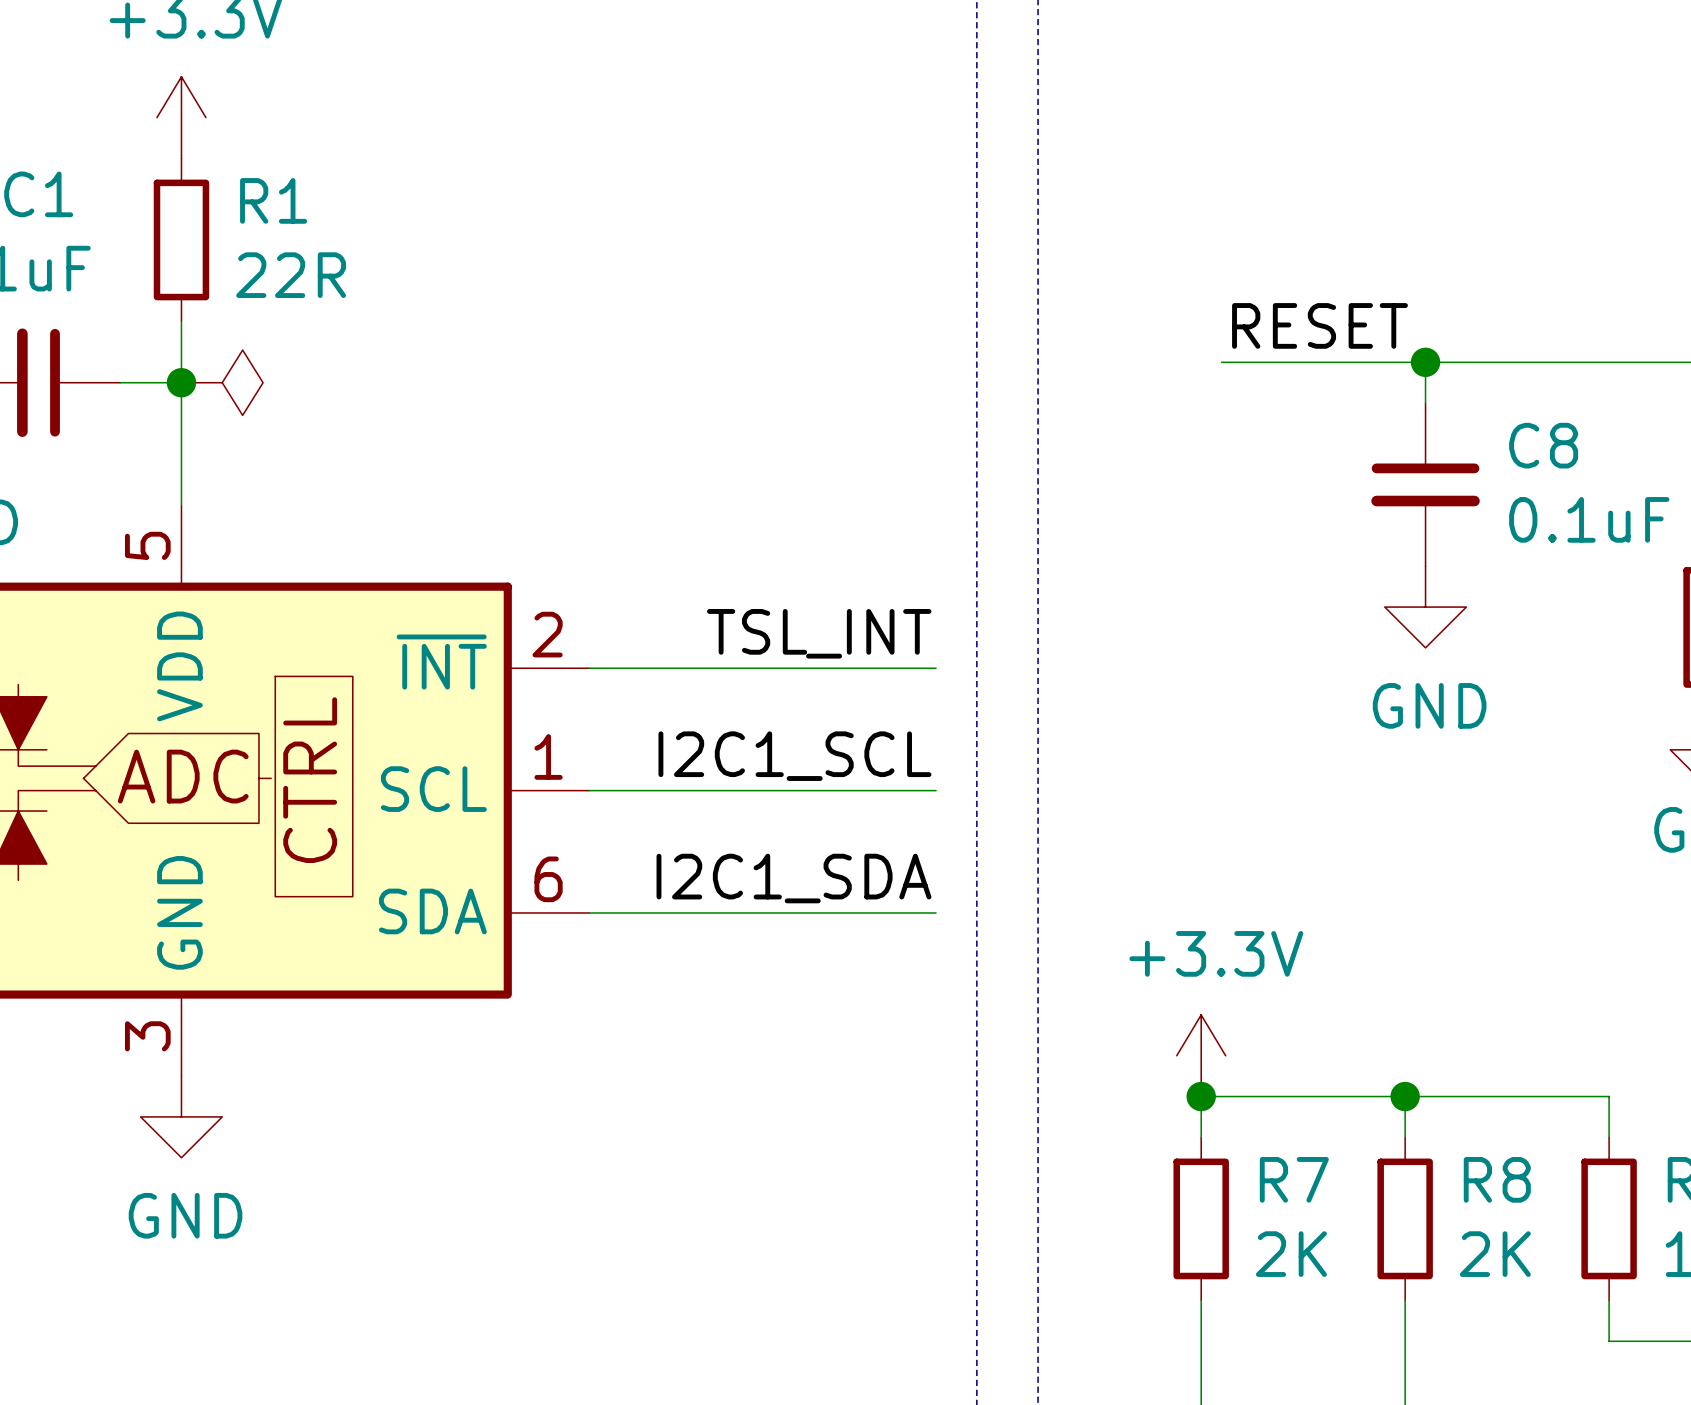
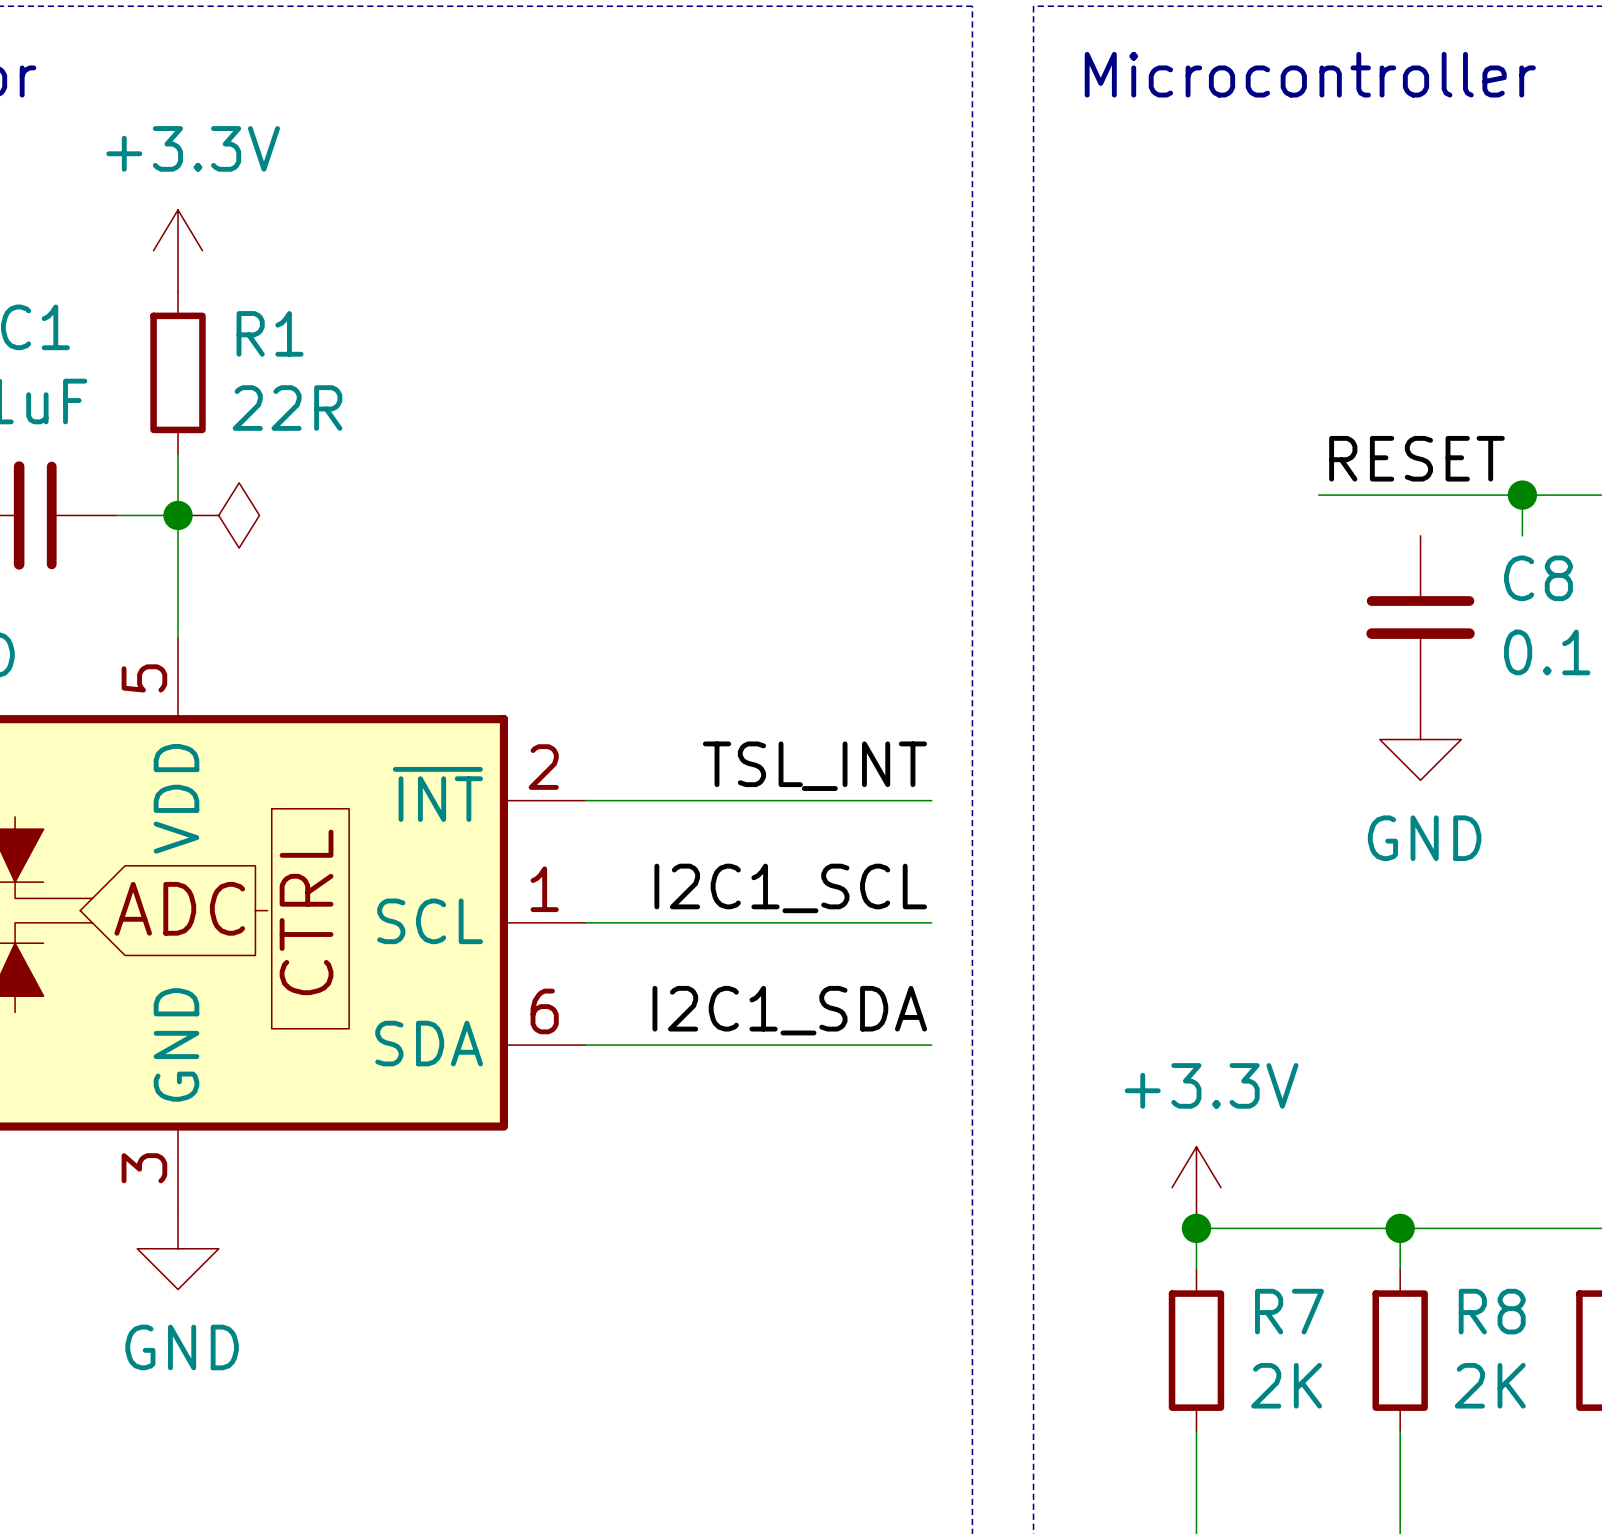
label position: RESET (1319, 325) -> RESET (1416, 458)
wire: (1221, 362) (1323, 362) -> none
wire: (1425, 362) (1425, 403) -> (1522, 495) (1522, 535)
junction position: (1425, 362) -> (1522, 495)

